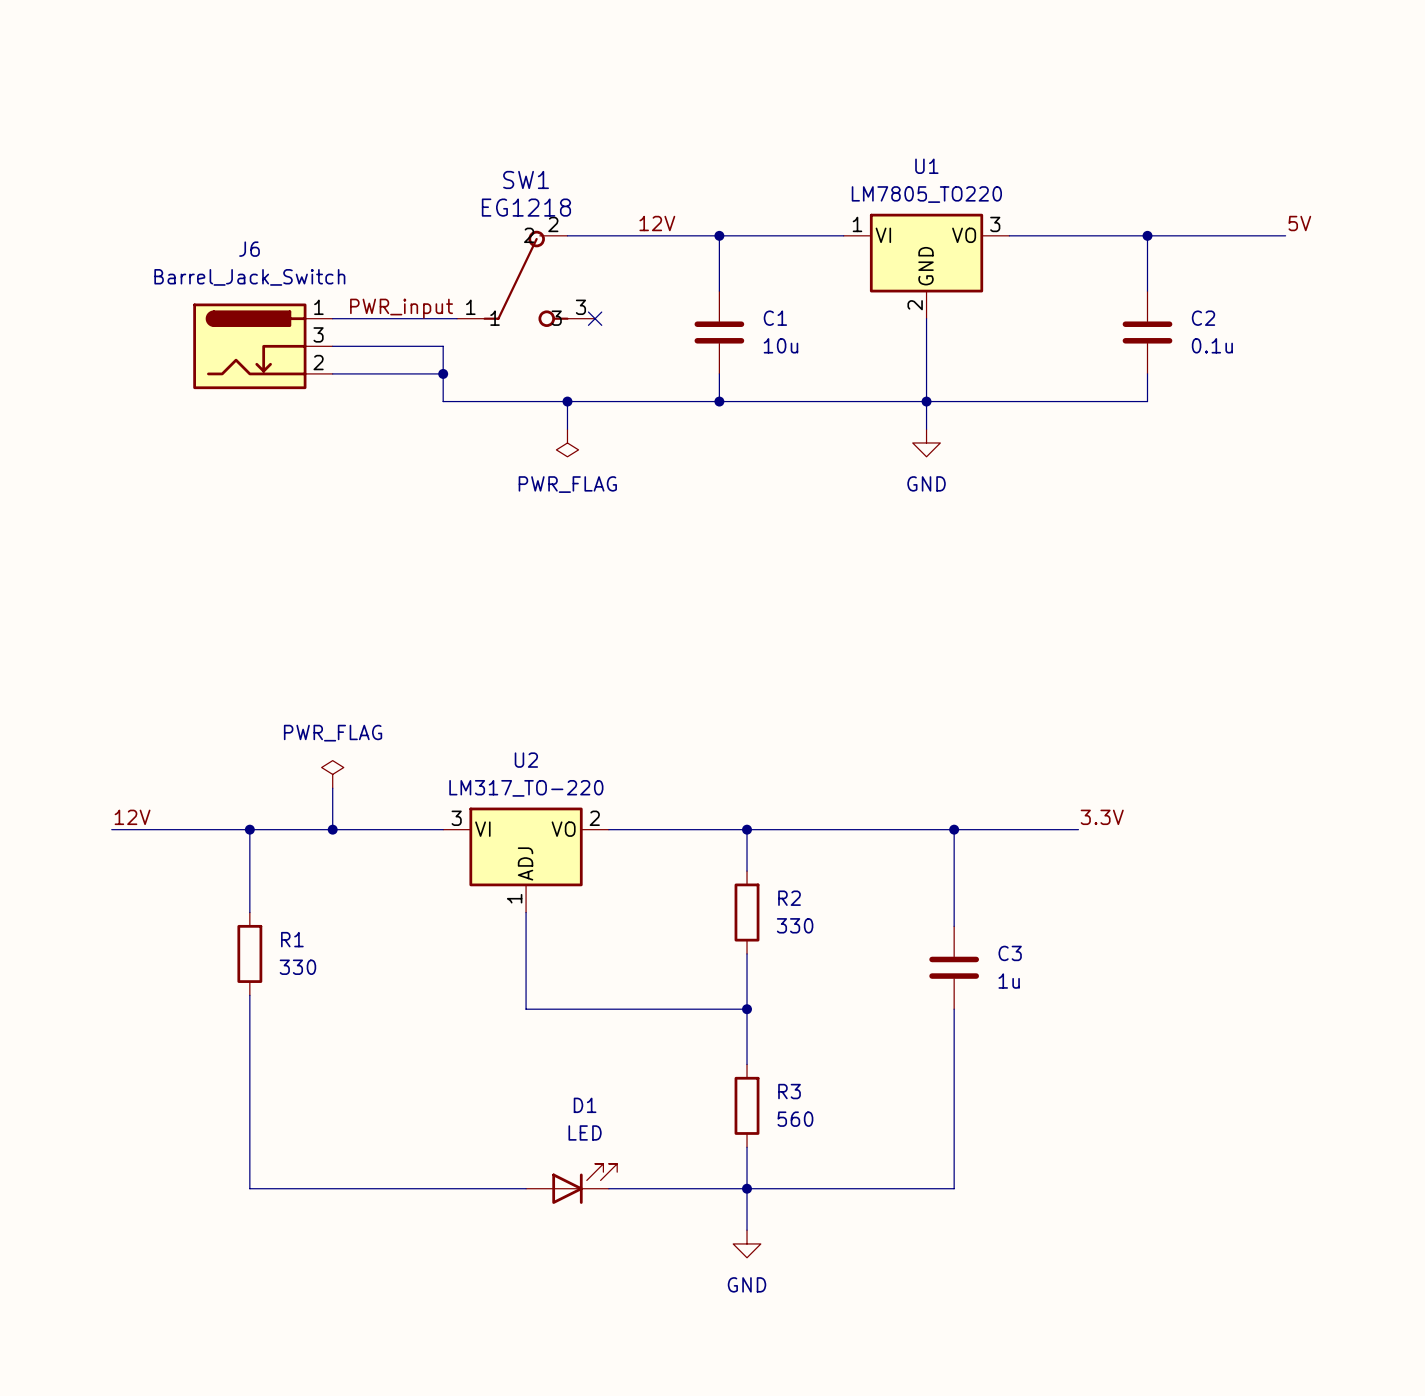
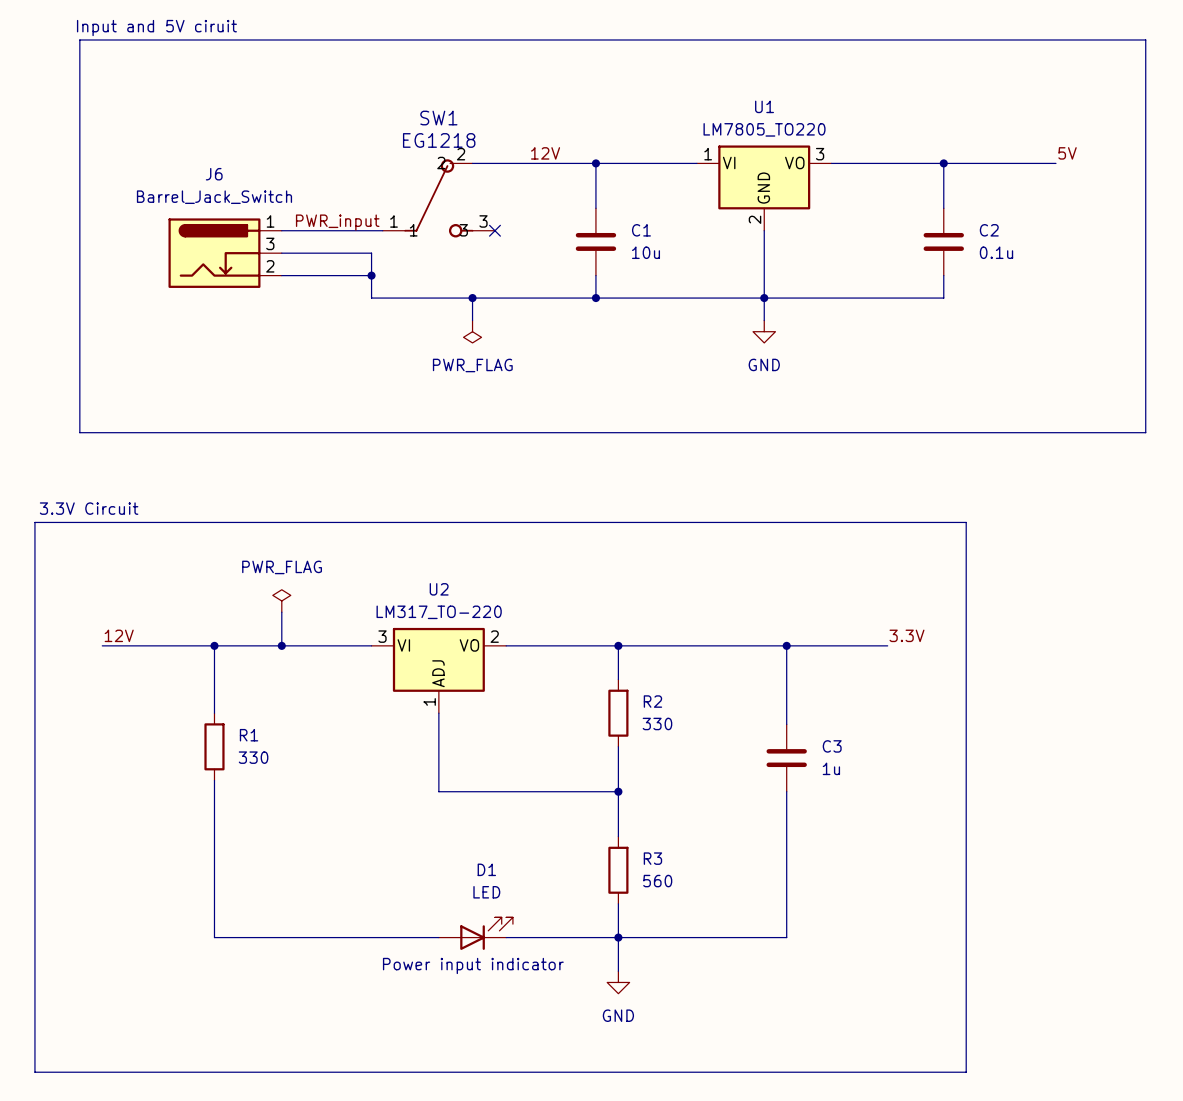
text: none -> Input and 5V ciruit (156, 28)
line: none -> (79, 39) (1145, 39) (1145, 432) (79, 432) (79, 39)
text: none -> 3.3V Circuit (89, 508)
line: none -> (34, 522) (966, 522) (966, 1072) (34, 1072) (34, 522)
D1 text: none -> Power input indicator (473, 965)

